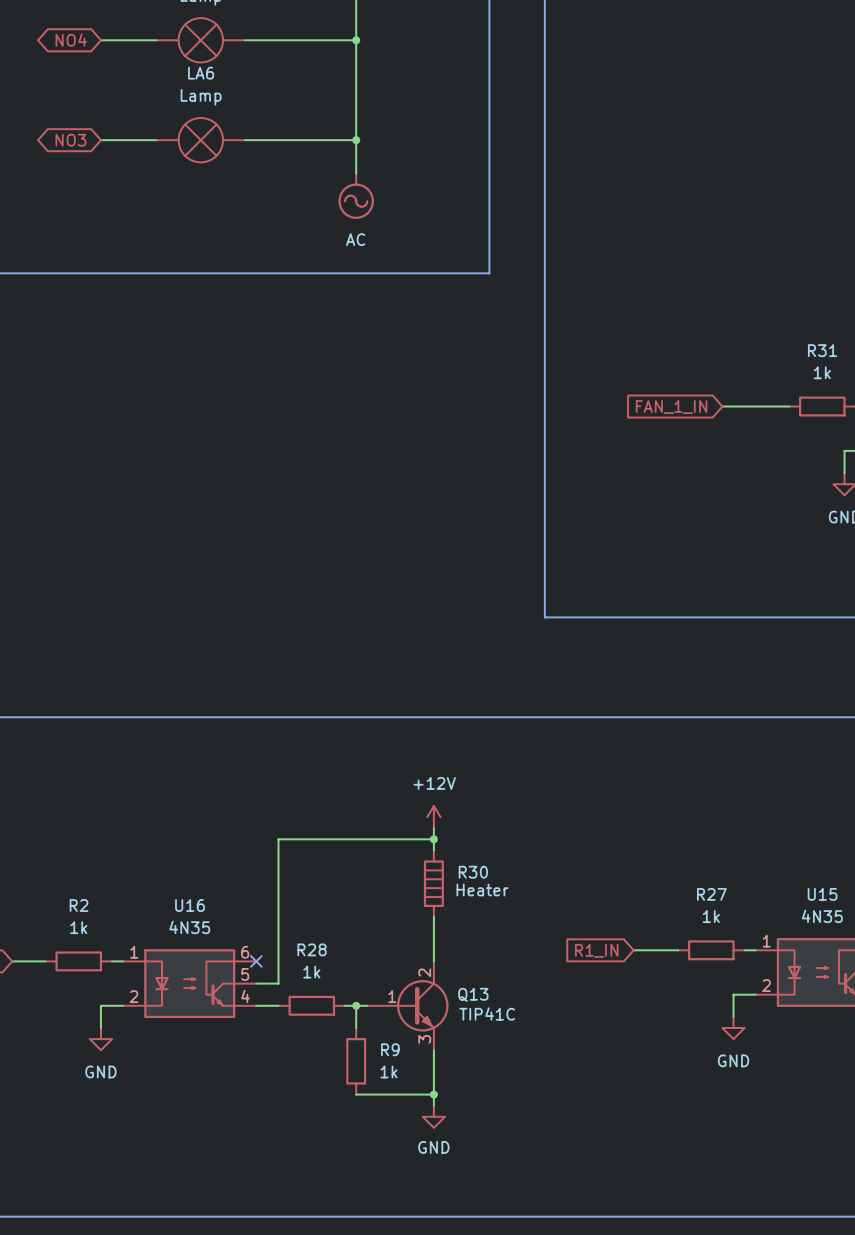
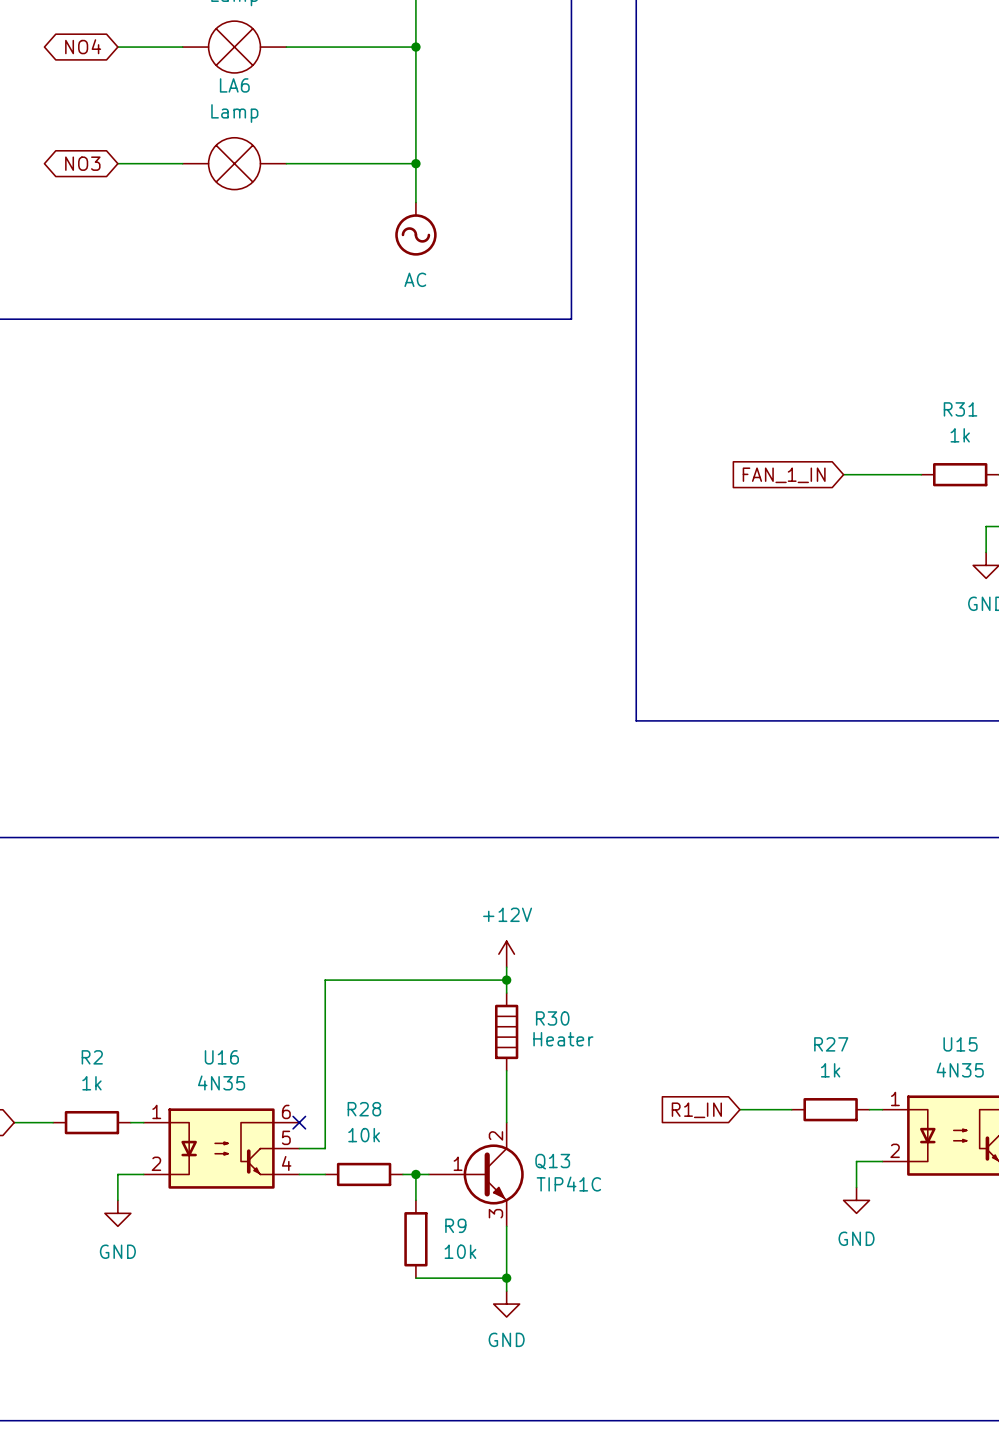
R28 value: 1k (311, 972) -> 10k (364, 1135)
R9 value: 1k (389, 1071) -> 10k (460, 1251)

